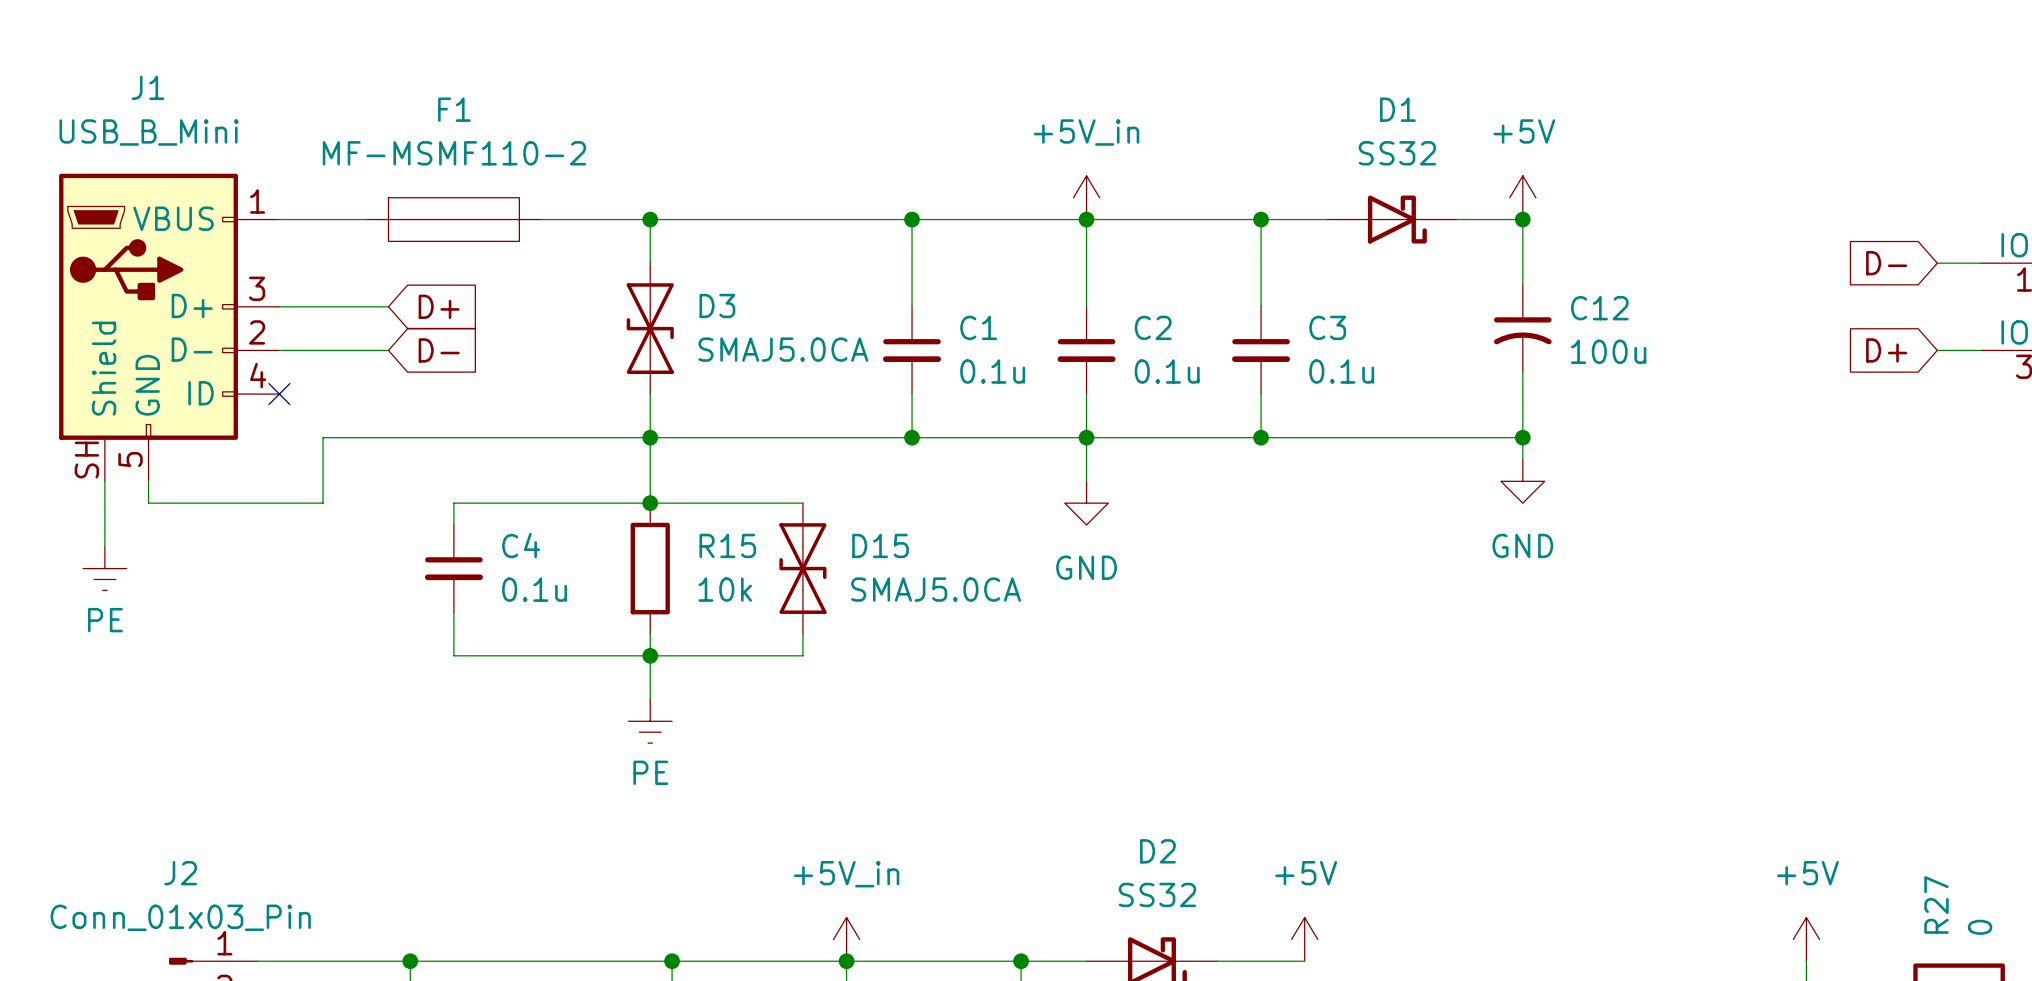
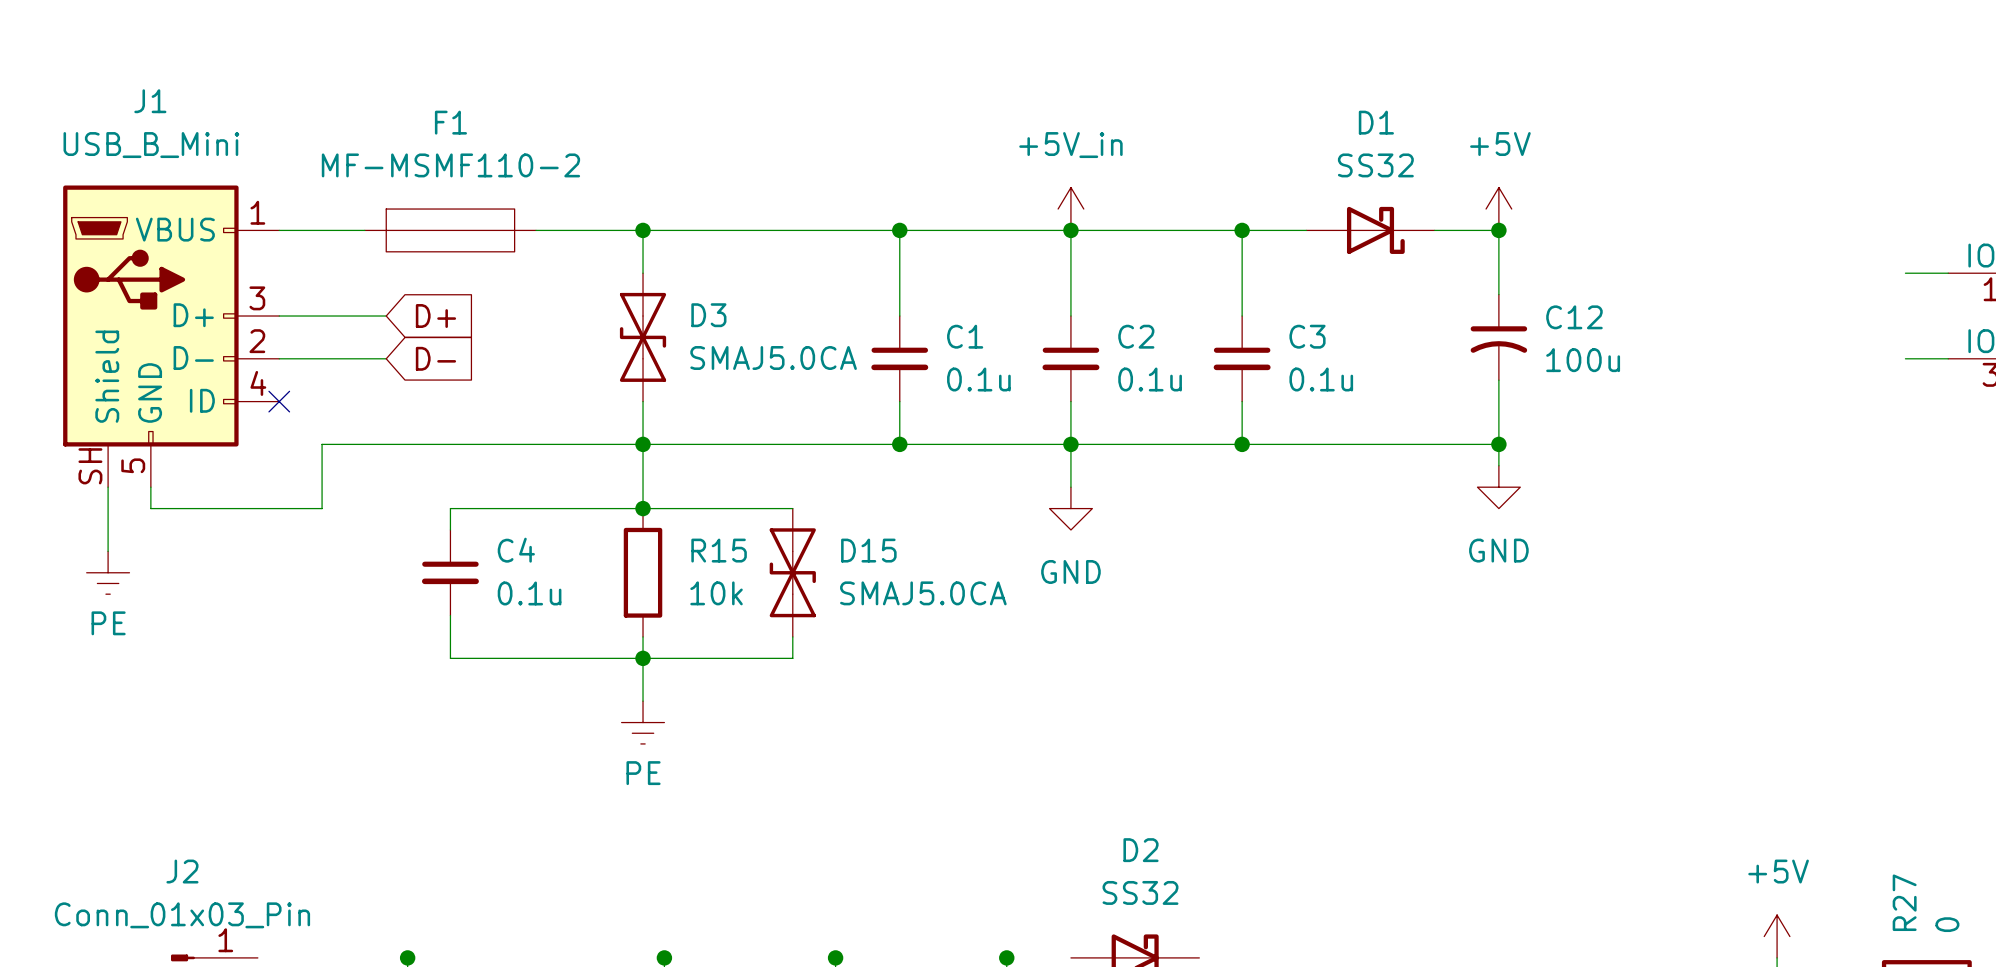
global label: D- (1886, 263) -> none
global label: D+ (1886, 350) -> none
power symbol: +5V_in (846, 939) -> none
power symbol: +5V (1304, 939) -> none
wire: (257, 961) (1086, 961) -> none
wire: (1217, 961) (1304, 961) -> none

